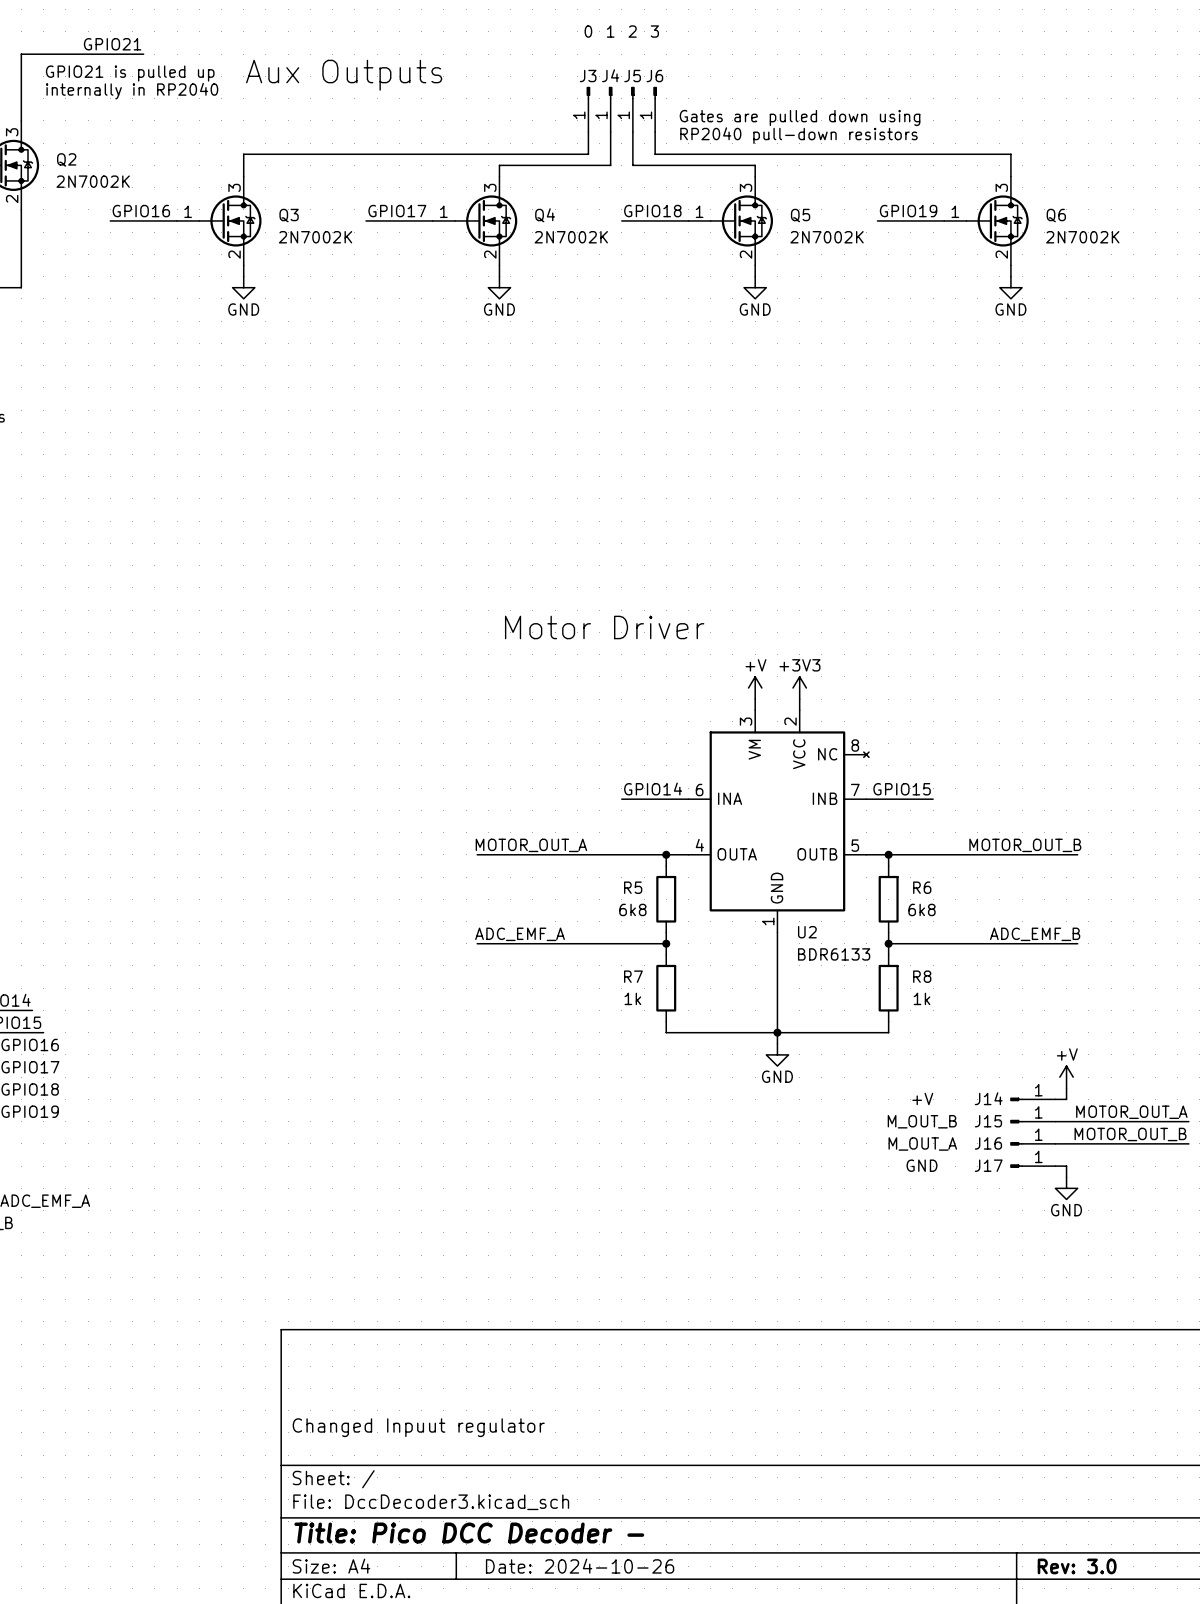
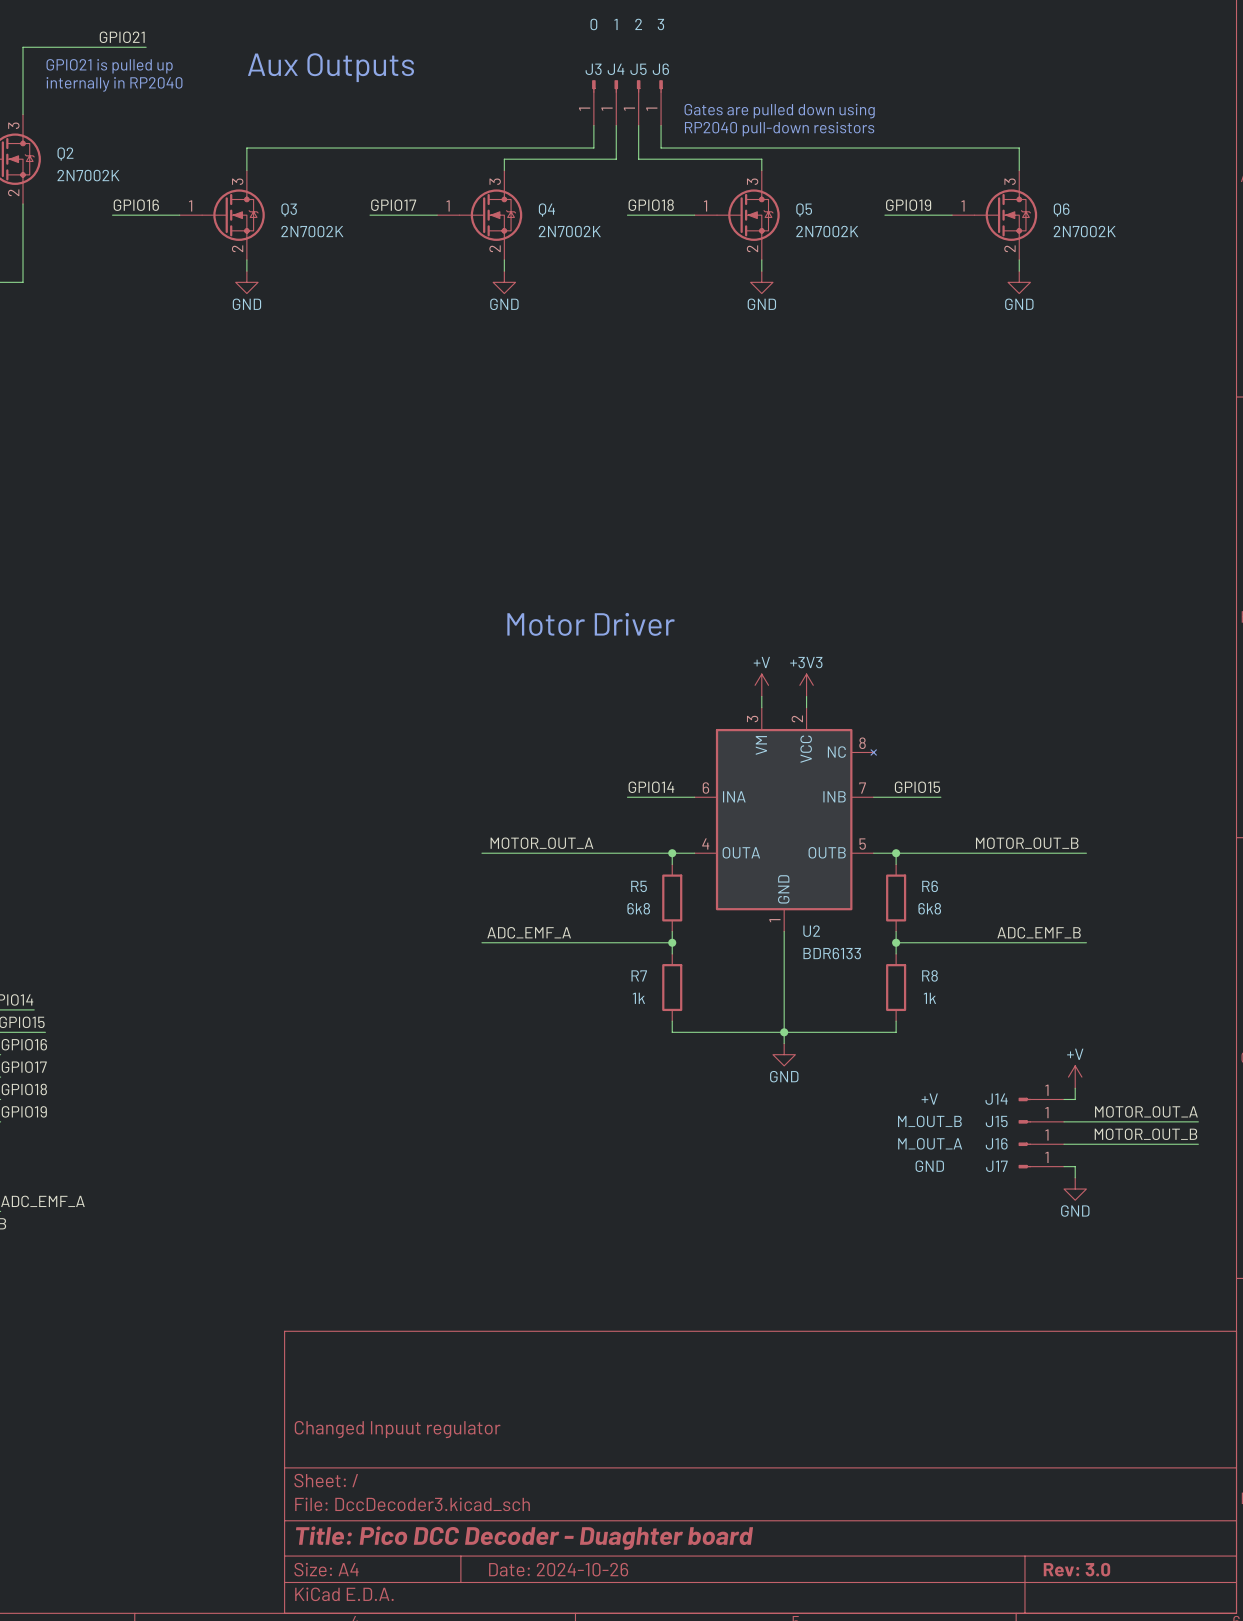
title block: Title: Pico DCC Decoder - (469, 1533) -> Title: Pico DCC Decoder - Duaghter board (524, 1538)

